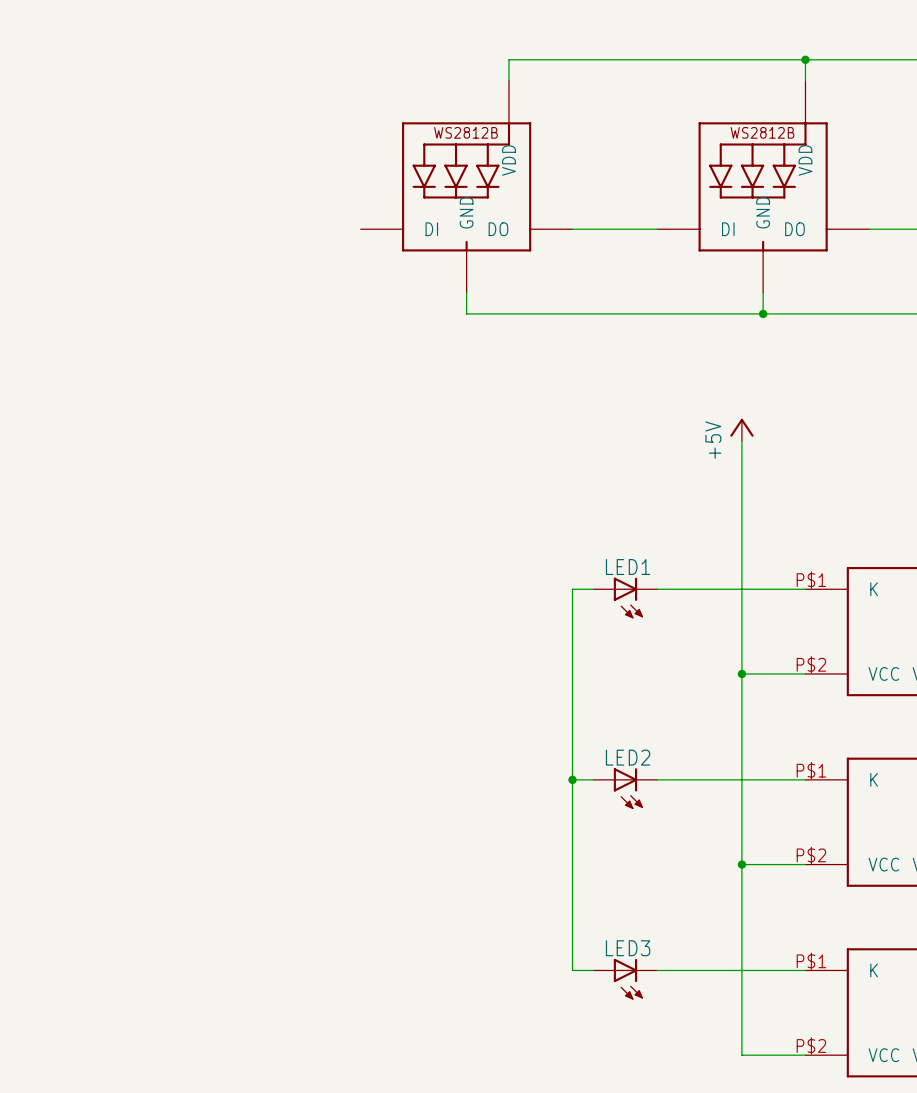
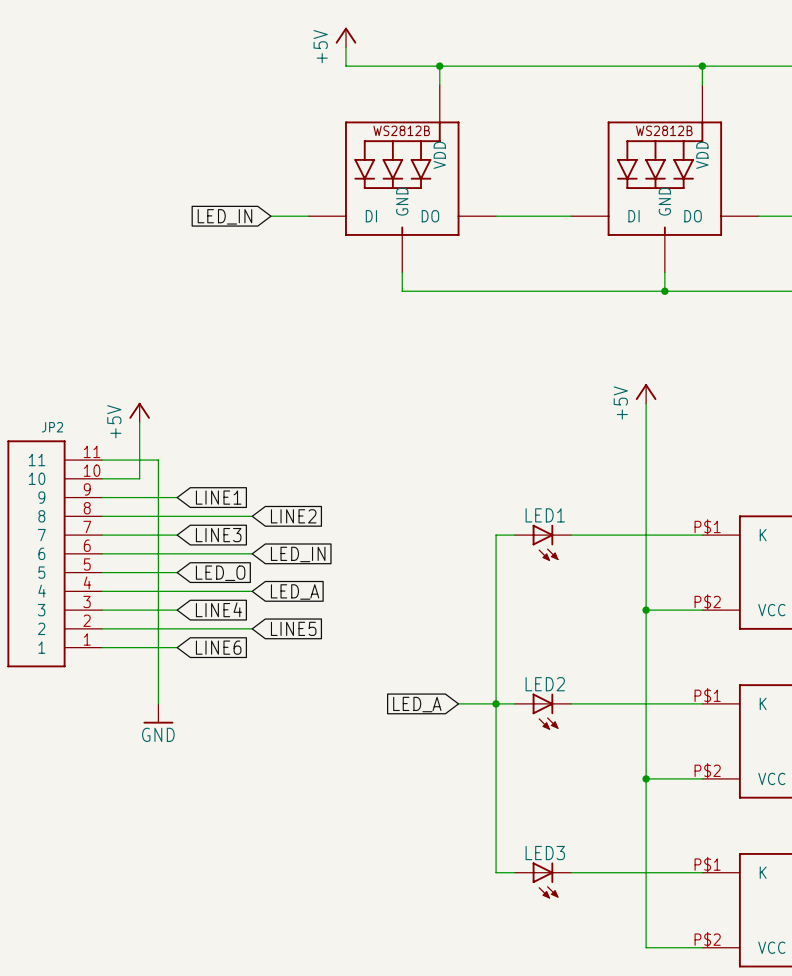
power symbol: none -> +5V (345, 37)
wire: none -> (345, 47) (345, 66) (439, 66)
junction: none -> (439, 66)
global label: none -> LED_IN (224, 216)
wire: none -> (270, 216) (308, 216)
power symbol: none -> +5V (139, 412)
wire: none -> (139, 422) (139, 478) (102, 478)
wire: none -> (102, 460) (158, 460) (158, 703)
wire: none -> (102, 497) (177, 497)
global label: none -> LINE1 (218, 497)
wire: none -> (102, 516) (252, 516)
global label: none -> LINE2 (293, 516)
wire: none -> (102, 535) (177, 535)
global label: none -> LINE3 (218, 535)
JP2: none -> (54, 553)
wire: none -> (102, 553) (252, 553)
global label: none -> LED_IN (298, 554)
wire: none -> (102, 572) (177, 572)
global label: none -> LED_O (220, 573)
wire: none -> (102, 591) (252, 591)
global label: none -> LED_A (295, 591)
wire: none -> (102, 610) (177, 610)
global label: none -> LINE4 (218, 609)
wire: none -> (102, 628) (252, 628)
global label: none -> LINE5 (293, 628)
wire: none -> (102, 647) (177, 647)
global label: none -> LINE6 (218, 647)
wire: none -> (458, 703) (496, 703)
global label: none -> LED_A (417, 704)
power symbol: none -> GND (158, 713)

